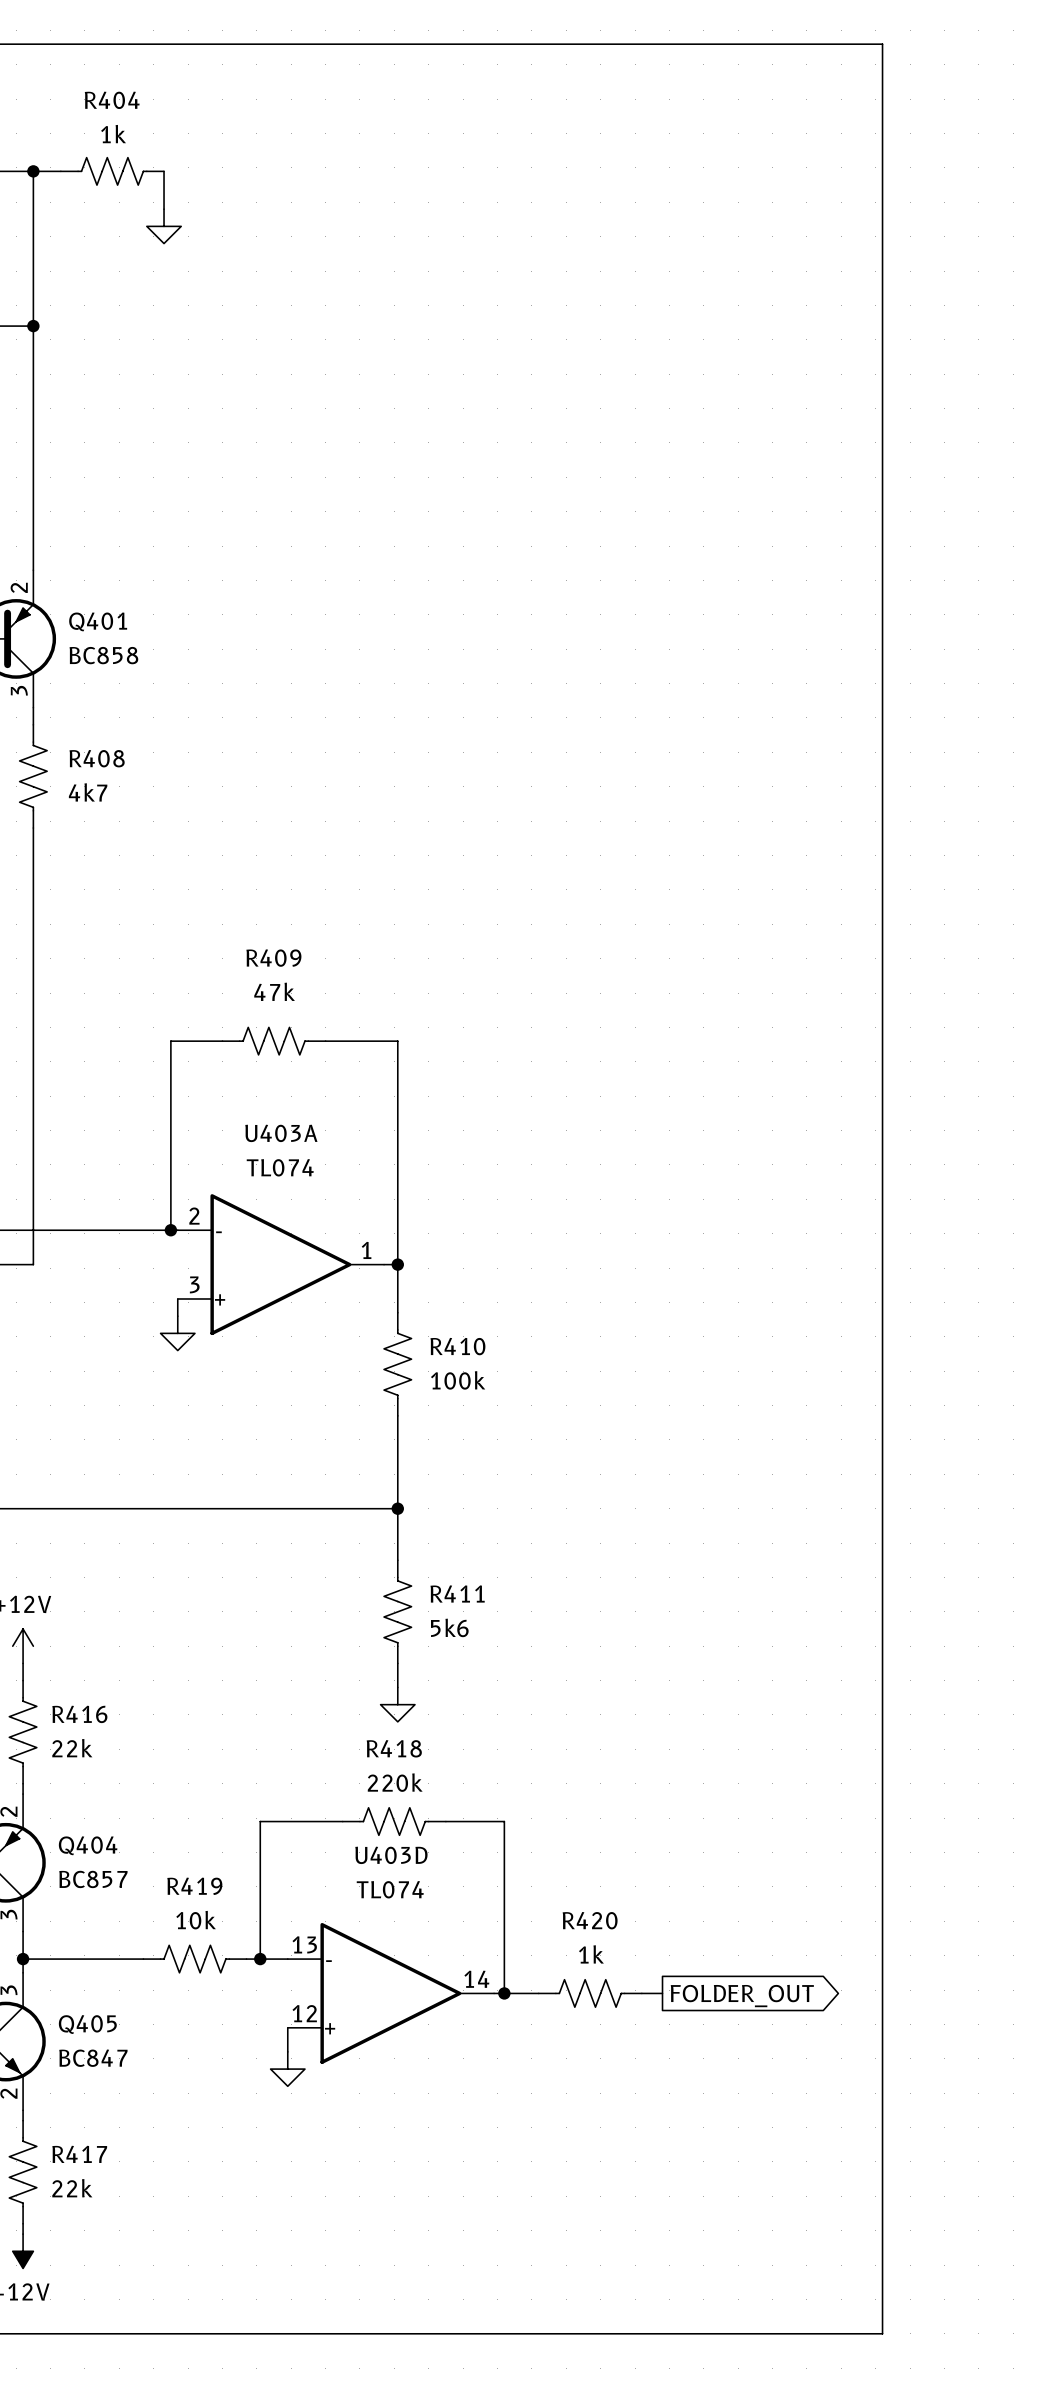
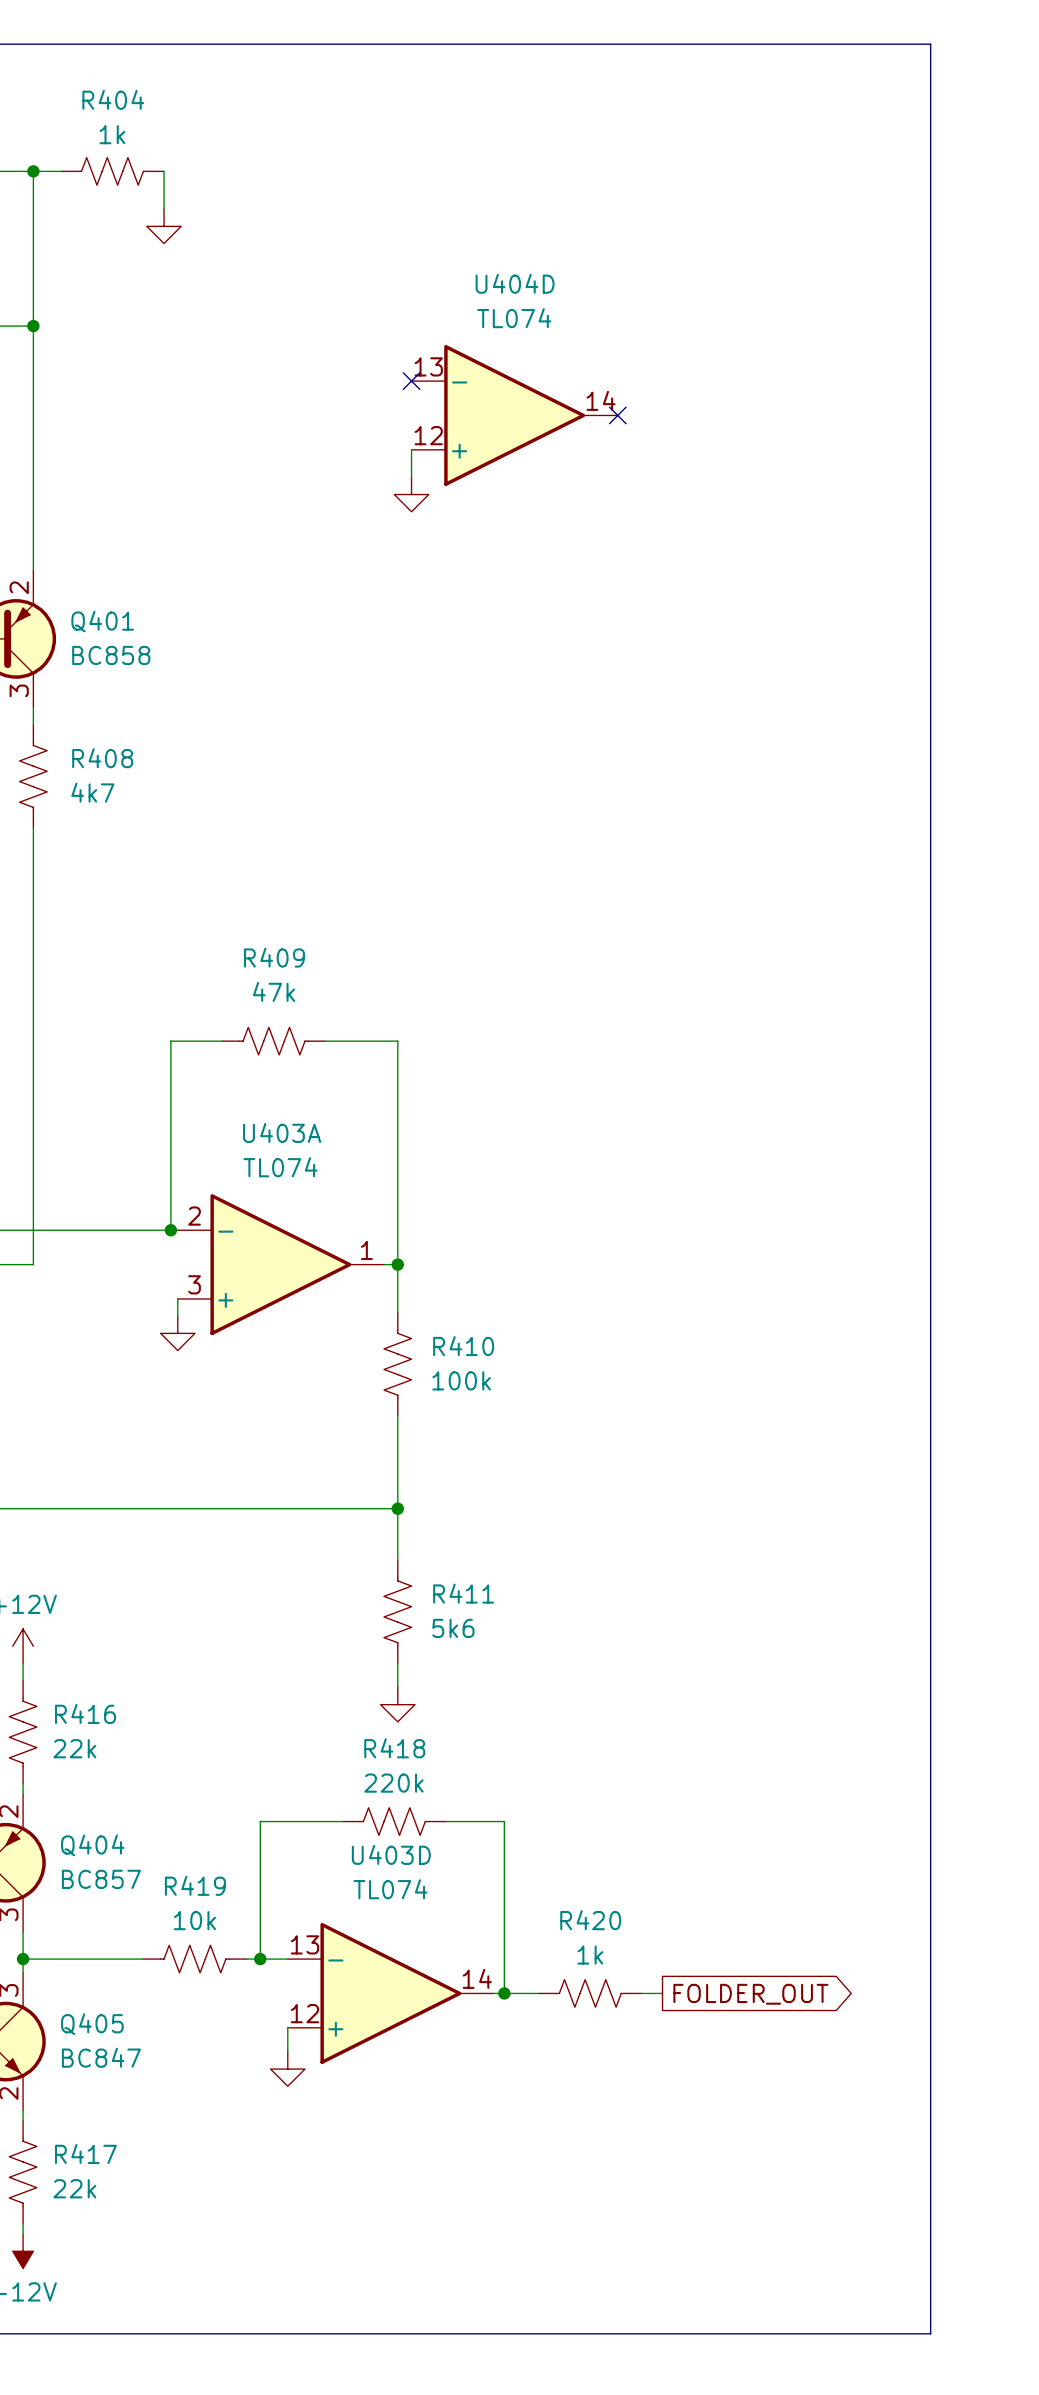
line: (882, 44) (882, 2333) -> (882, 44) (930, 44) (930, 2333) (882, 2333)
no-connect mark: none -> (411, 381)
U404D: none -> TL074 (514, 415)
no-connect mark: none -> (617, 415)
wire: none -> (411, 449) (411, 477)
power symbol: none -> (411, 494)

